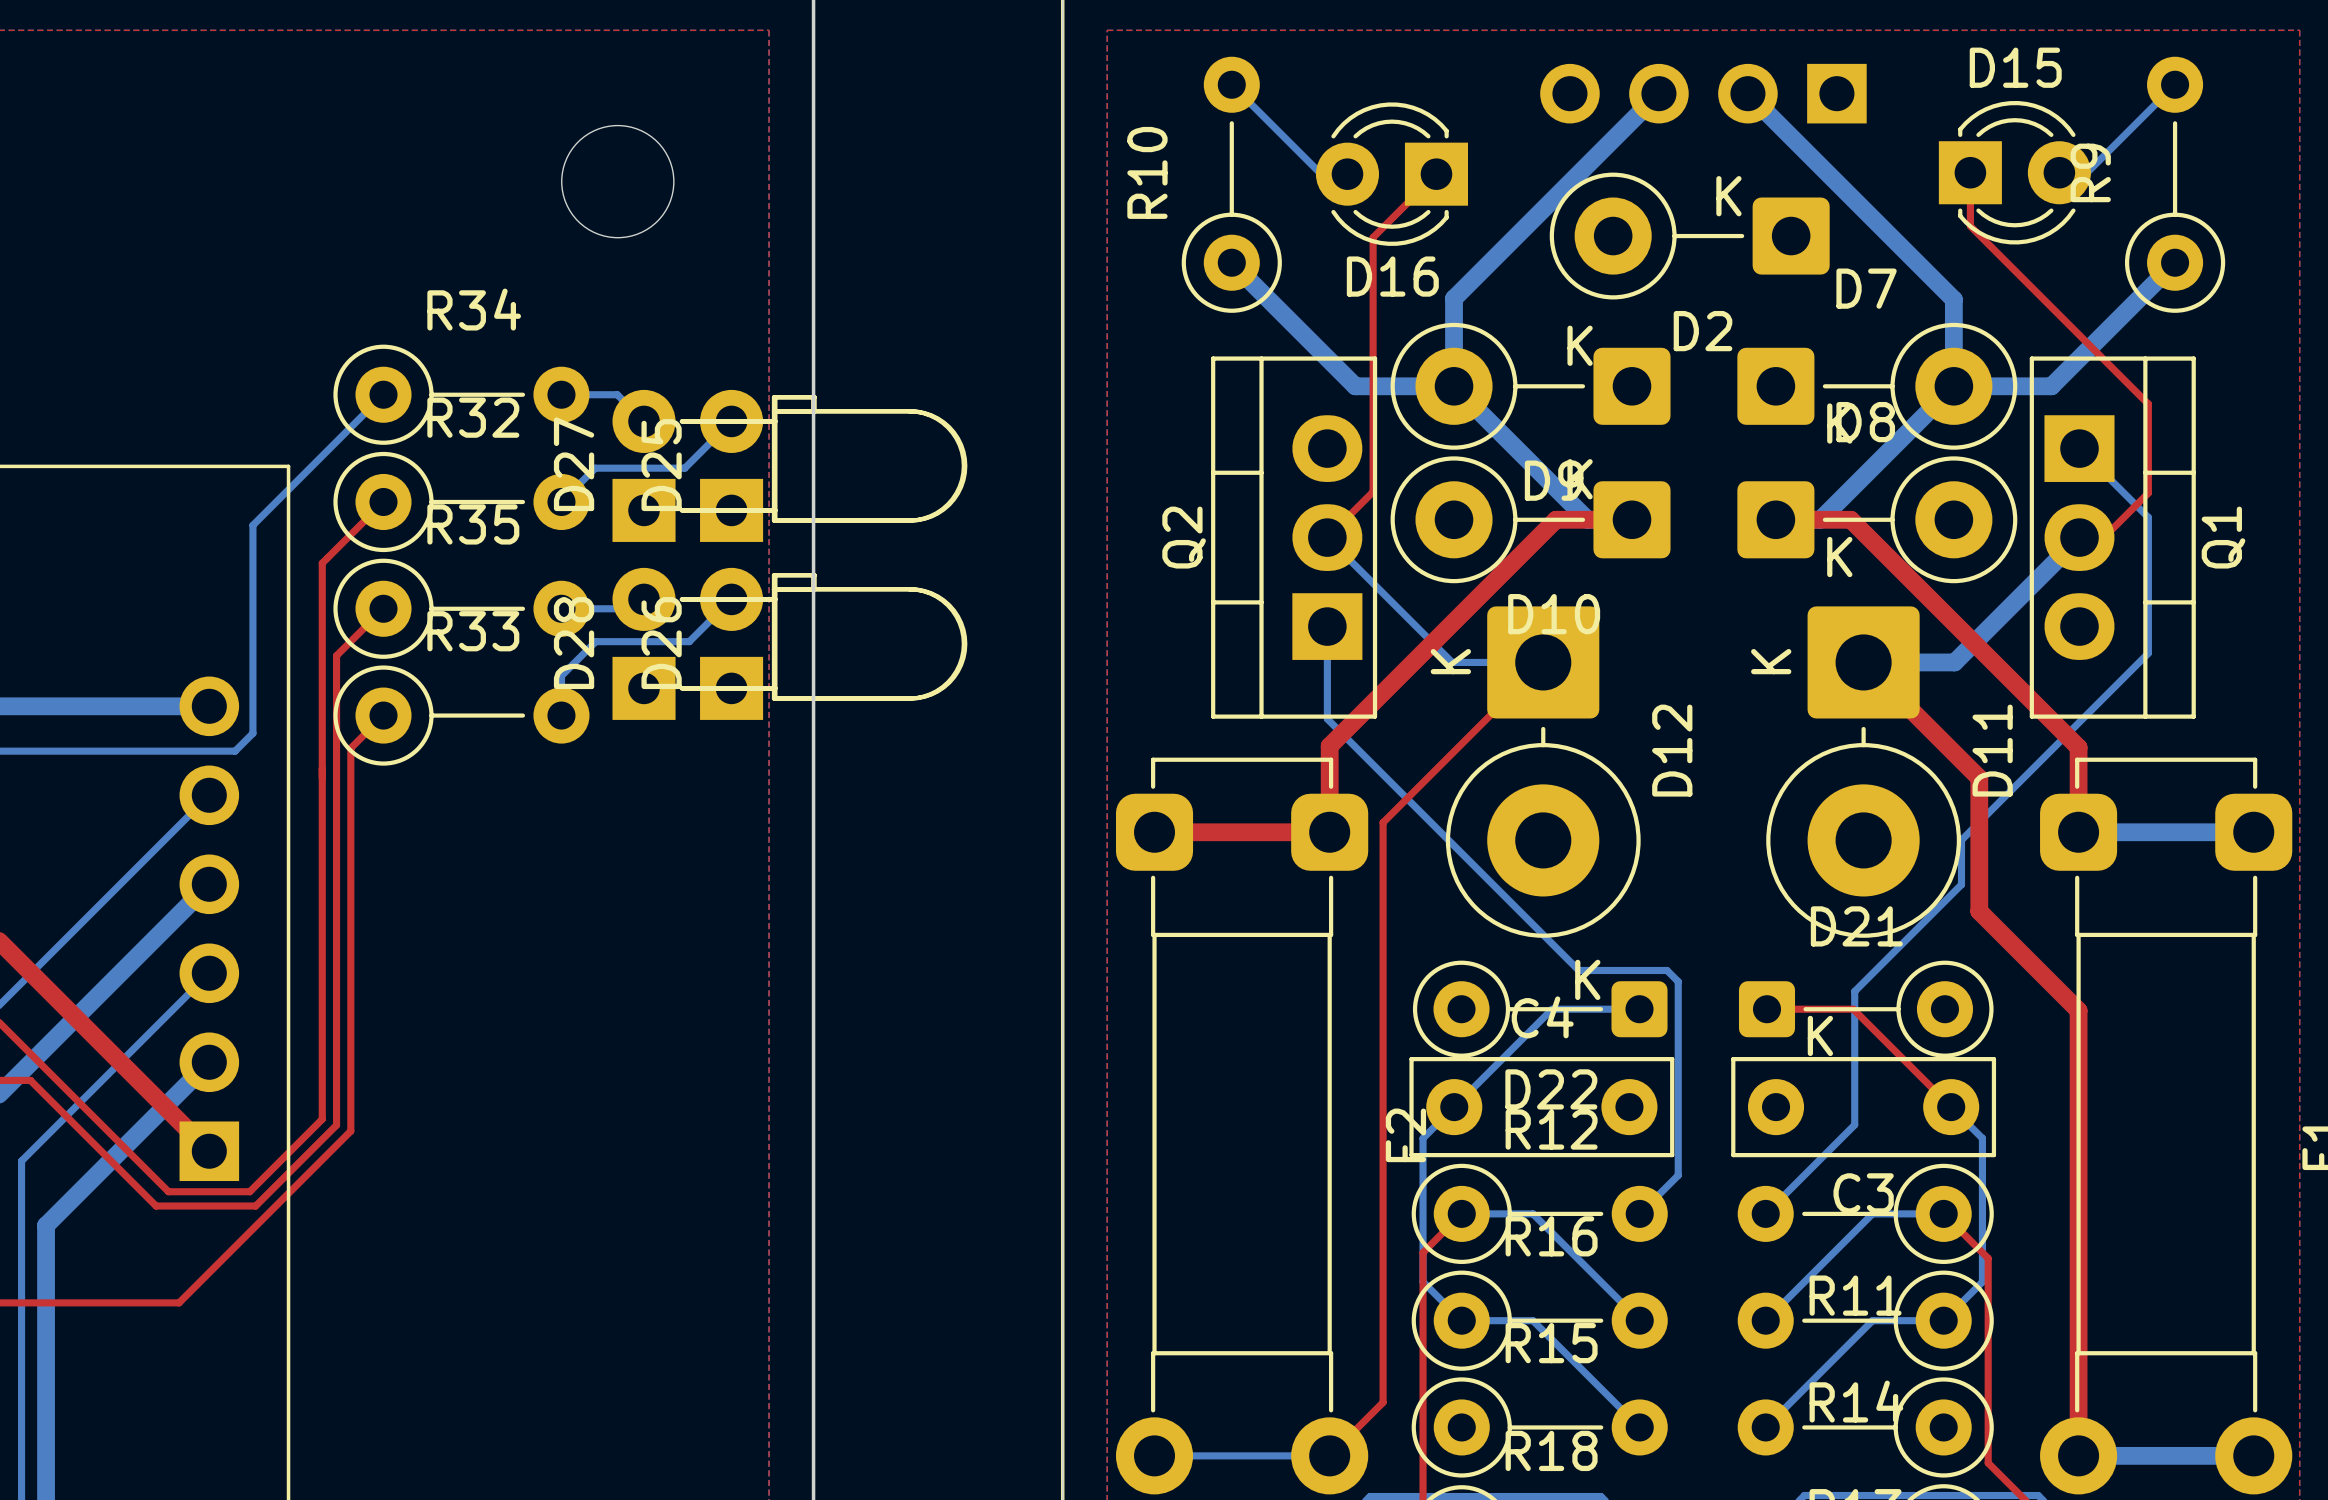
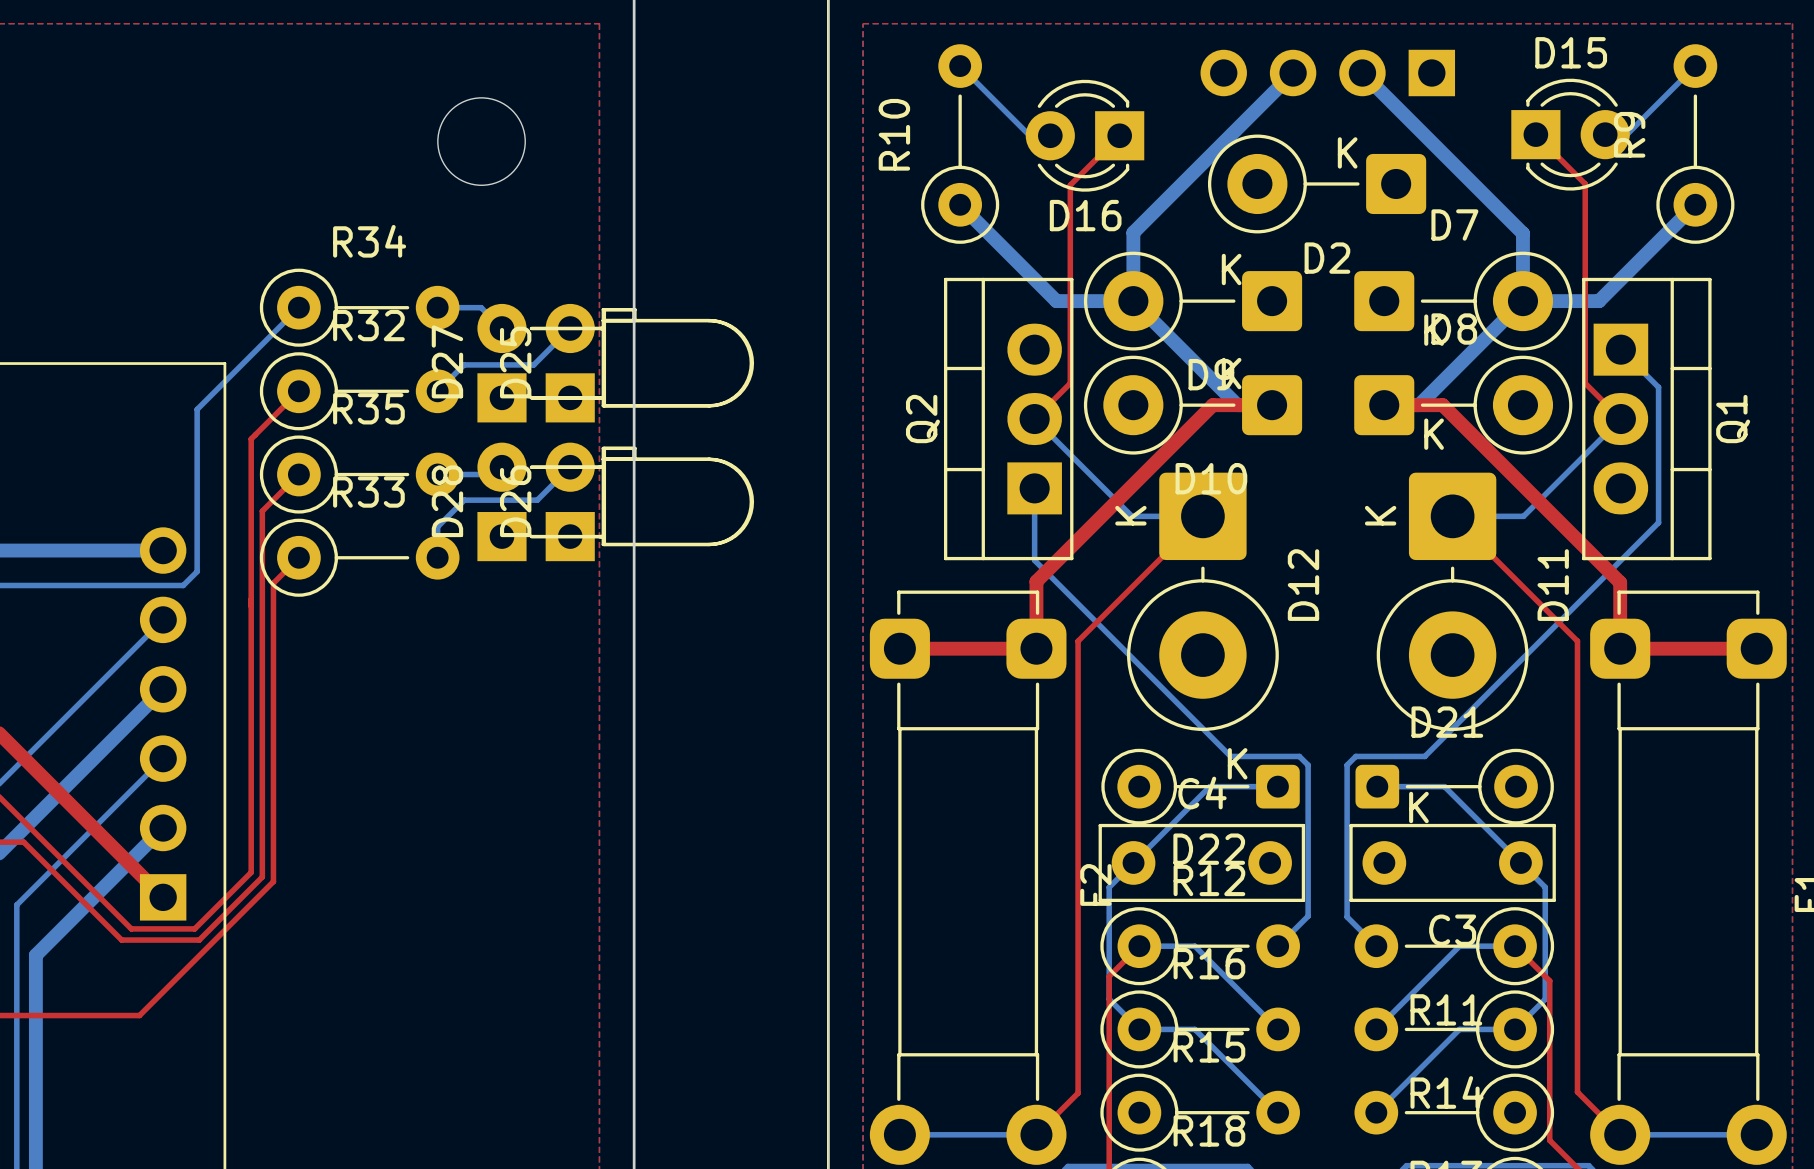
top track: (1970, 172) (1970, 226) (2148, 404) (2148, 493) (2103, 537) (2079, 537) -> (1535, 134) (1585, 184) (1585, 383) (1620, 419)
bottom track: (2127, 496) (2148, 517) (2148, 653) (1961, 840) (1961, 884) (1854, 991) (1854, 1124) (1765, 1213) -> (1658, 387) (1658, 522) (1424, 756) (1355, 756) (1347, 765) (1347, 916) (1376, 946)
bottom track width: thick (2079, 537) (1954, 662) (1863, 662) -> thin (1620, 419) (1523, 516) (1452, 516)
top track width: thick (1863, 662) (1979, 778) -> thin (1452, 516) (1542, 606)
top track: (1979, 778) (1979, 911) (2078, 1010) (2078, 1455) -> (1542, 606) (1577, 641) (1577, 1092) (1620, 1134)
bottom track: (2078, 832) (2253, 832) -> none
top track: none -> (1620, 648) (1756, 648)
bottom track: none -> (1377, 786) (1444, 786) (1520, 862)
top track: (1766, 1009) (1853, 1009) (1951, 1107) -> none
bottom track width: thick (2078, 1455) (2253, 1455) -> thin (1620, 1134) (1756, 1134)

